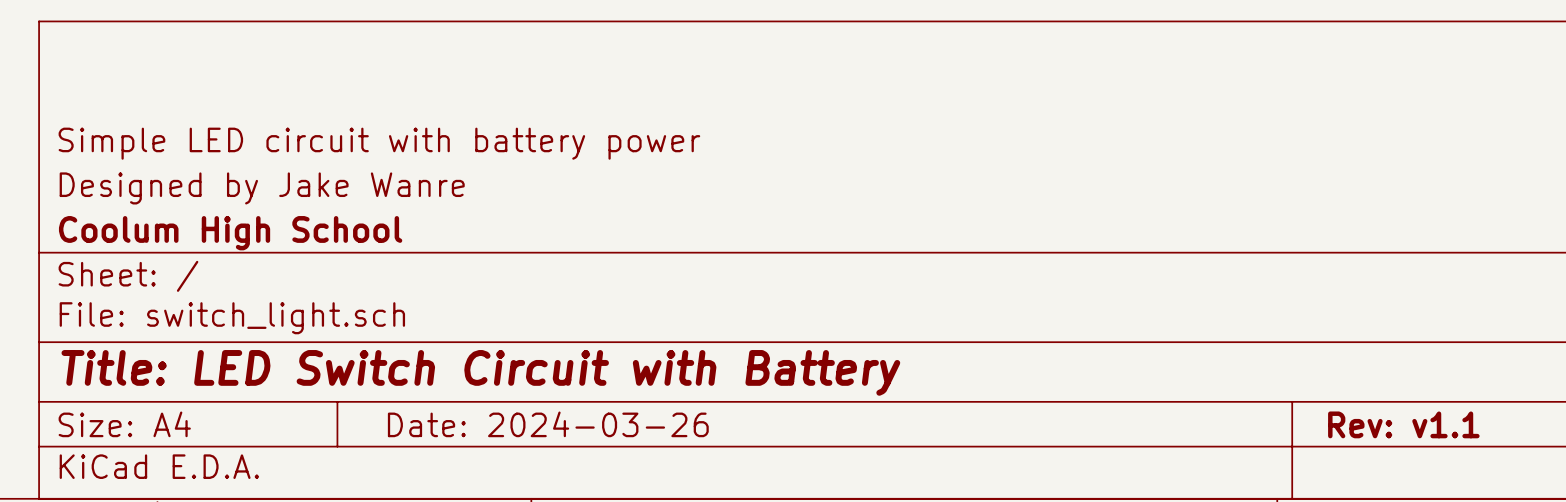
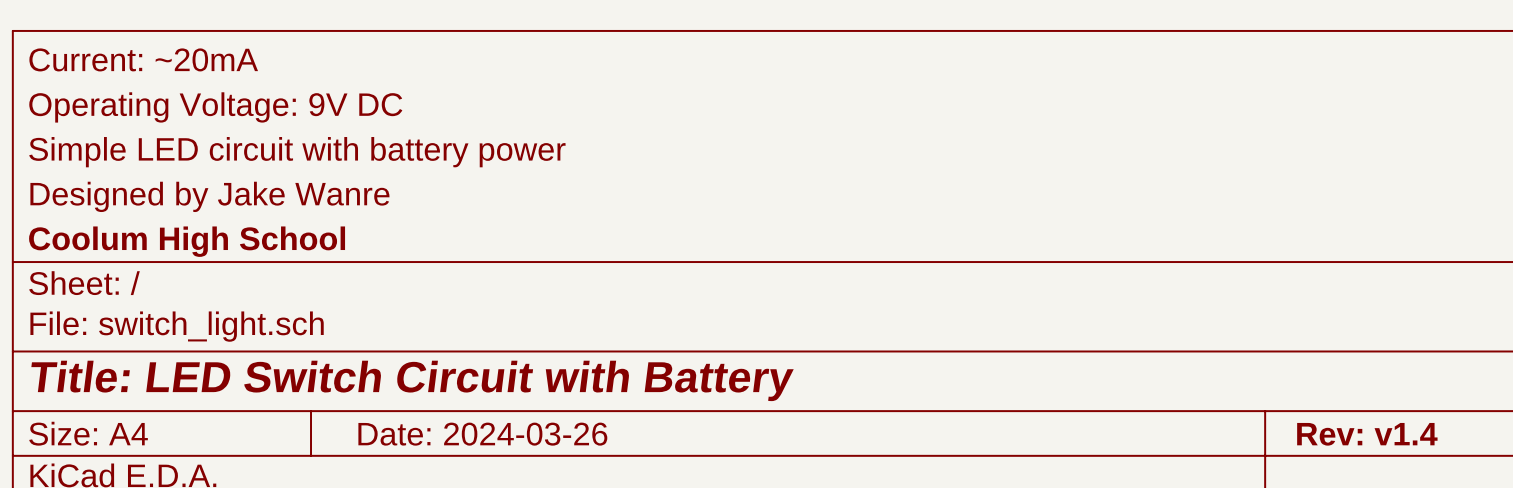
title block: none -> Current: ~20mA (143, 59)
title block: none -> Operating Voltage: 9V DC (215, 107)
title block: Rev: v1.1 (1403, 424) -> Rev: v1.4 (1367, 434)

